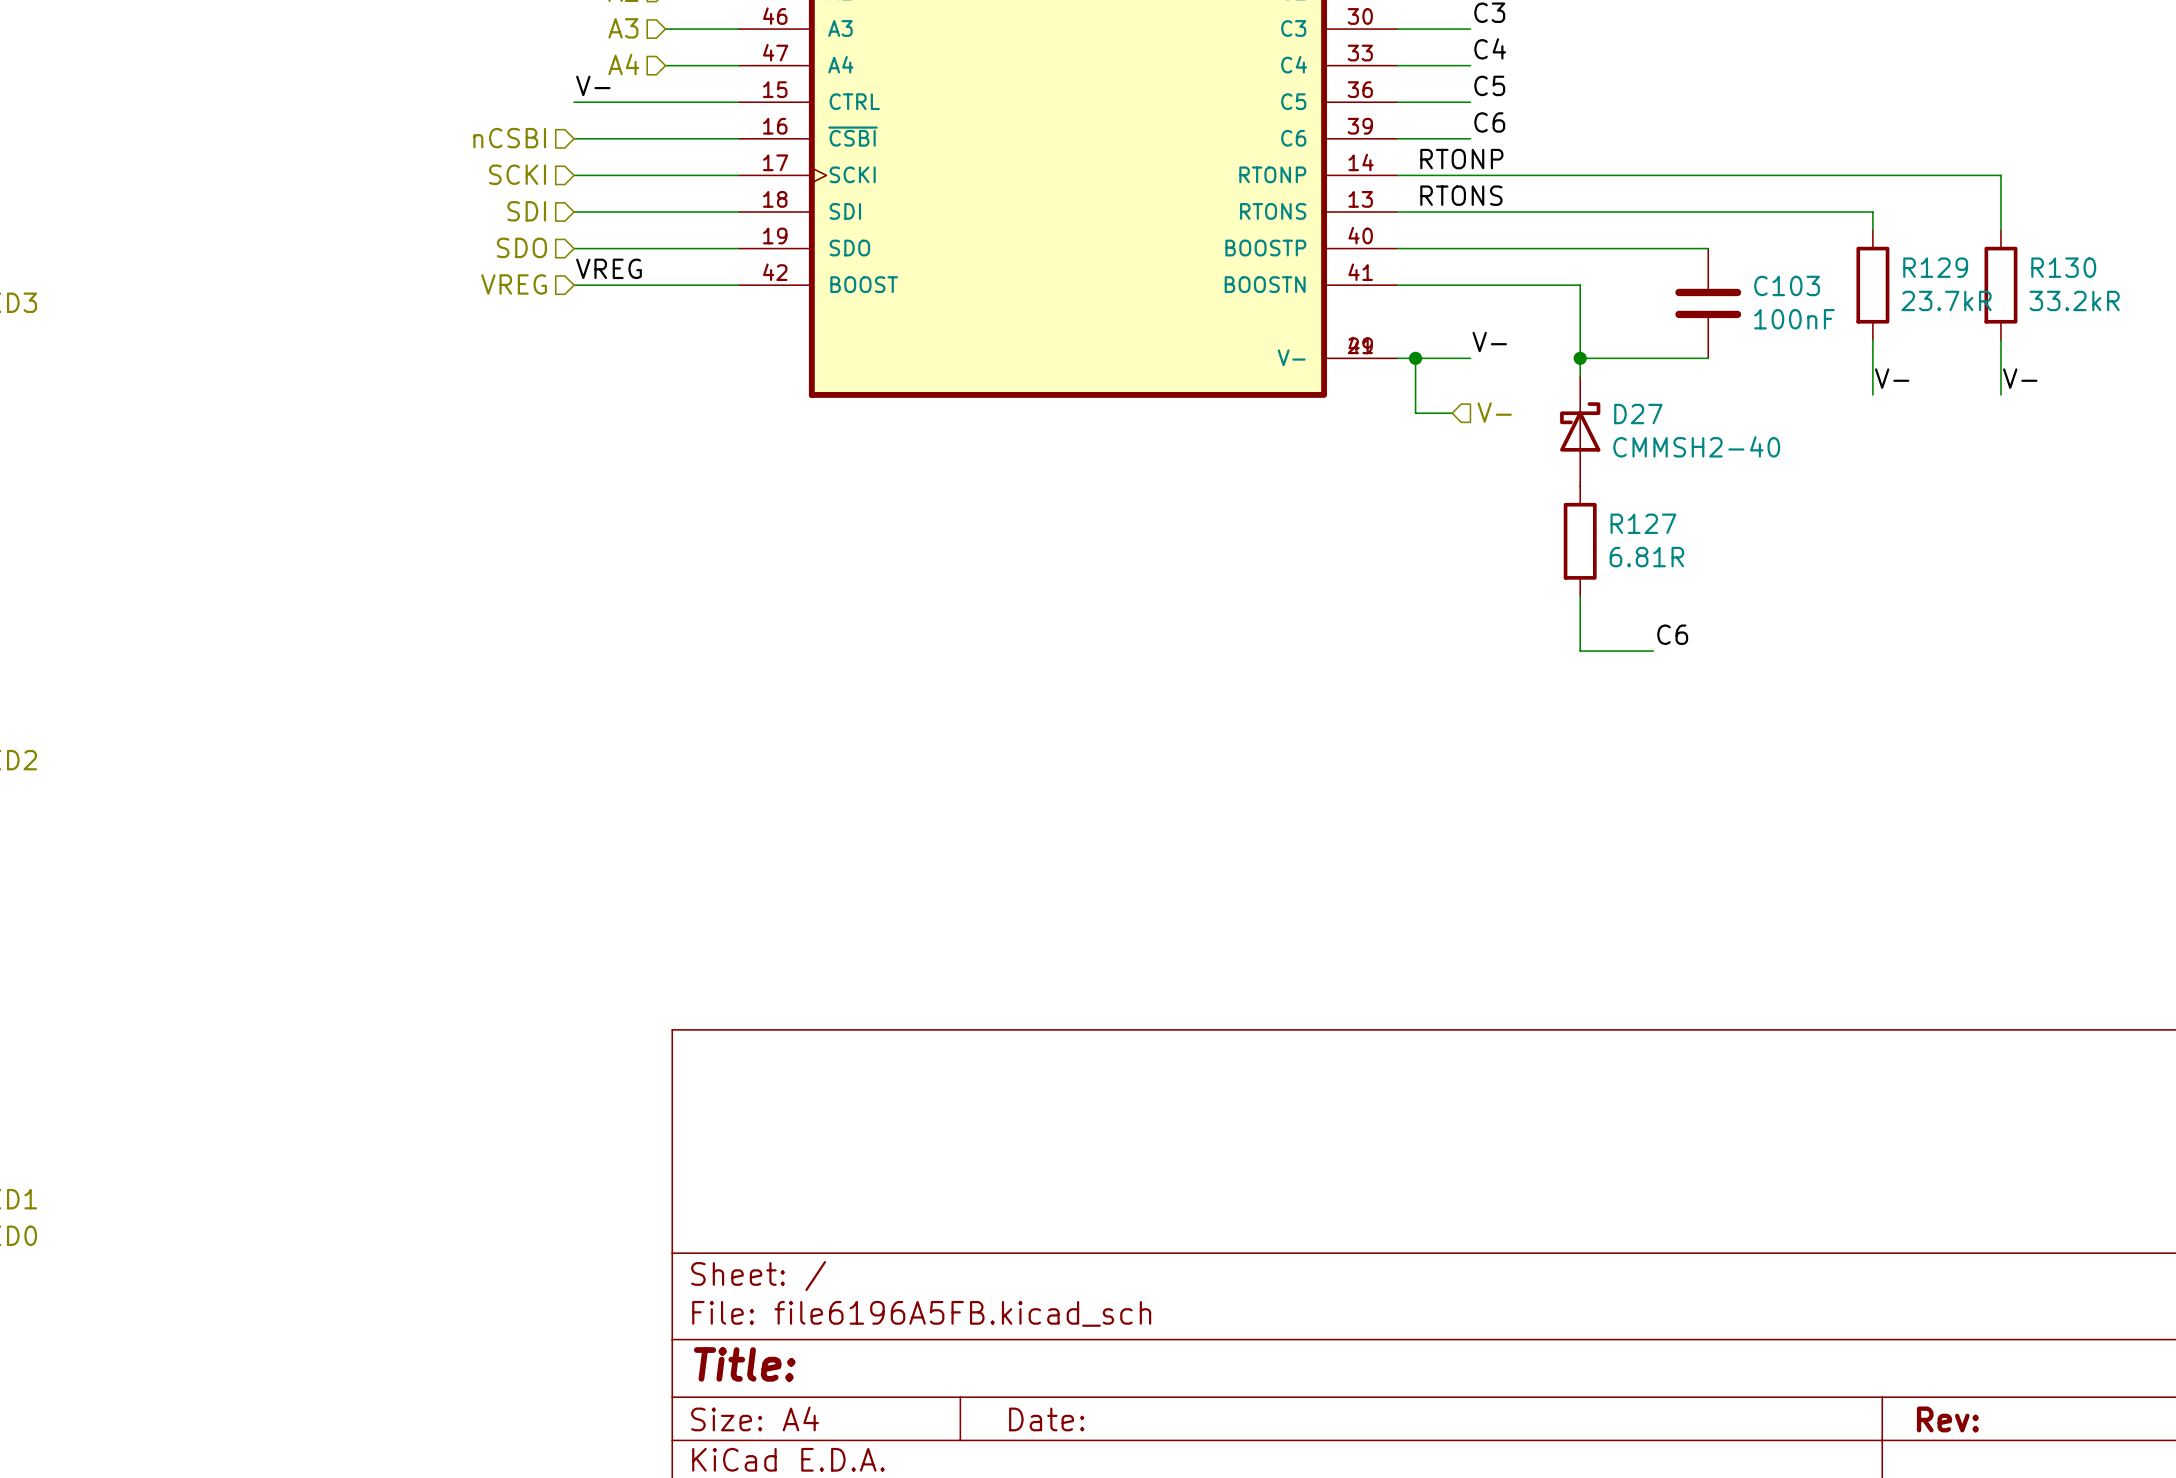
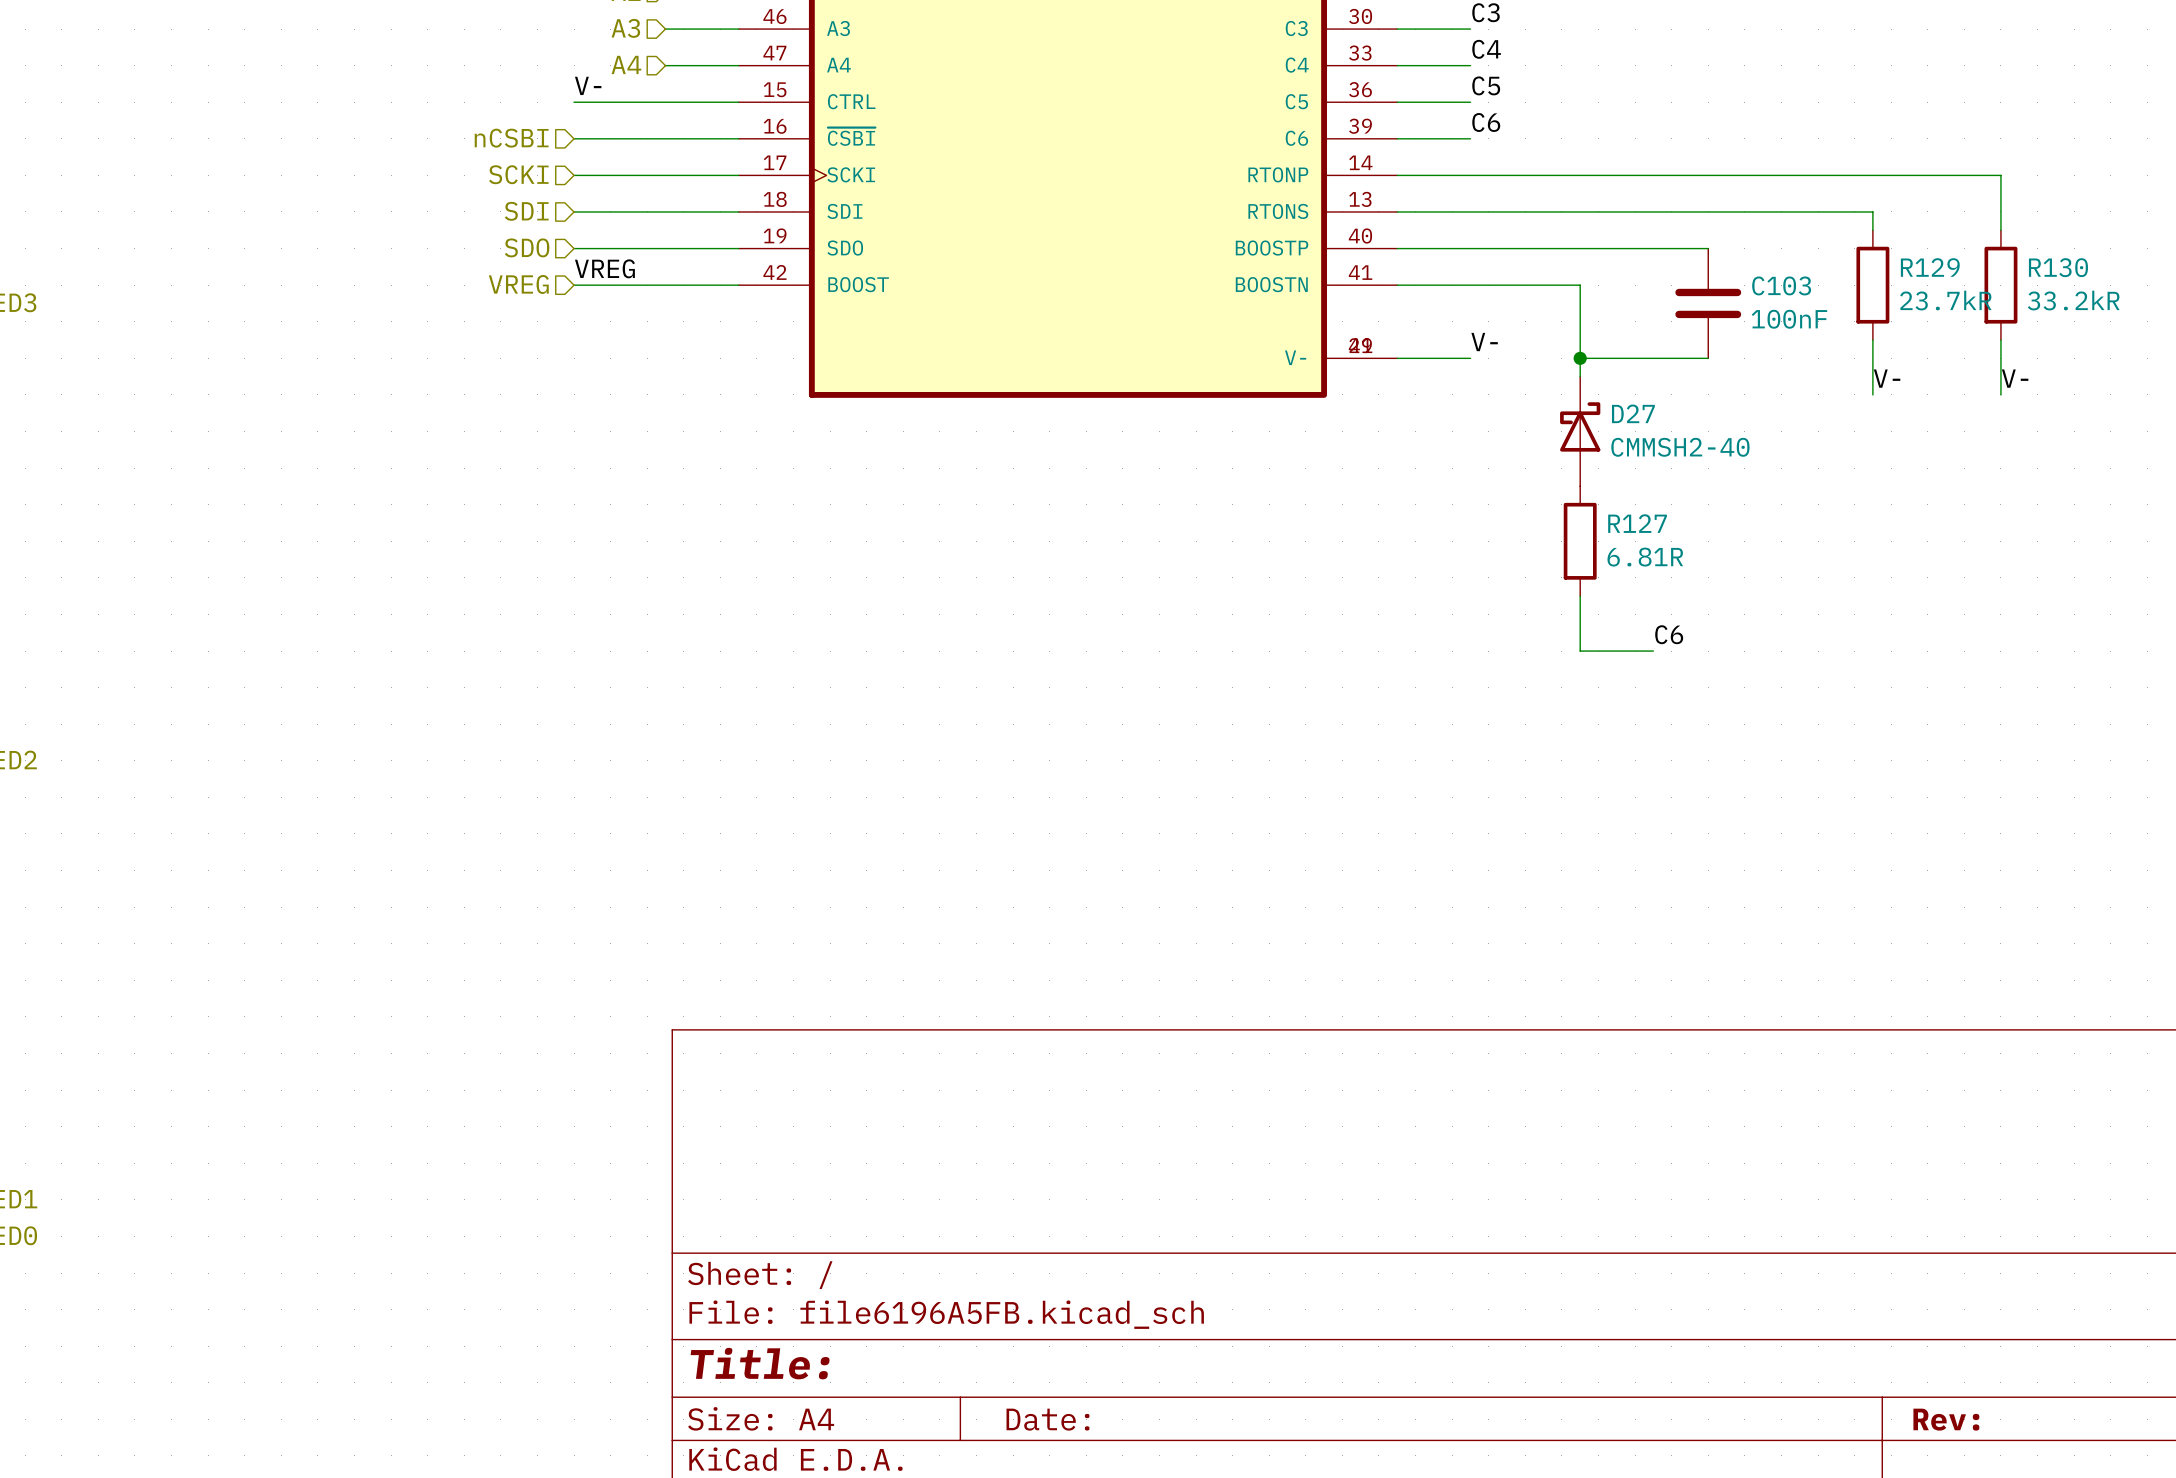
label: RTONP (1461, 159) -> none
label: RTONS (1461, 195) -> none
wire: (1415, 358) (1415, 413) (1452, 413) -> none
junction: (1415, 358) -> none
hierarchical label: V- (1494, 412) -> none

